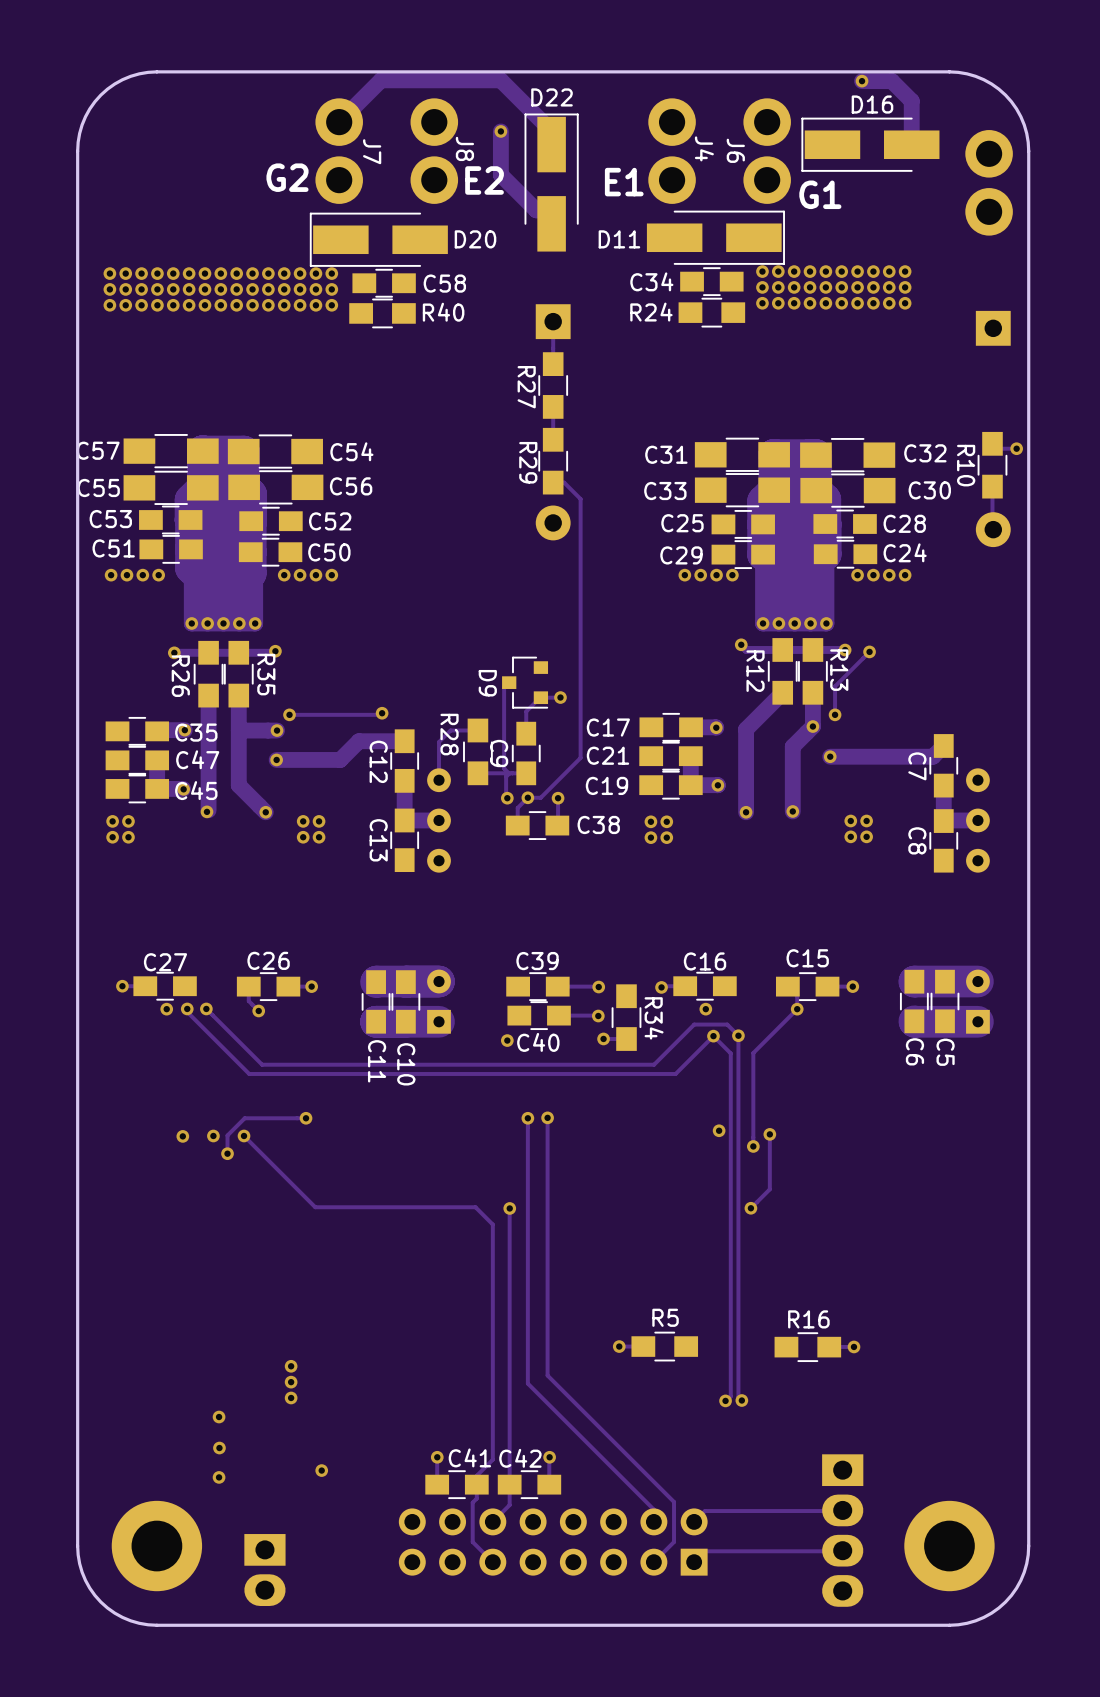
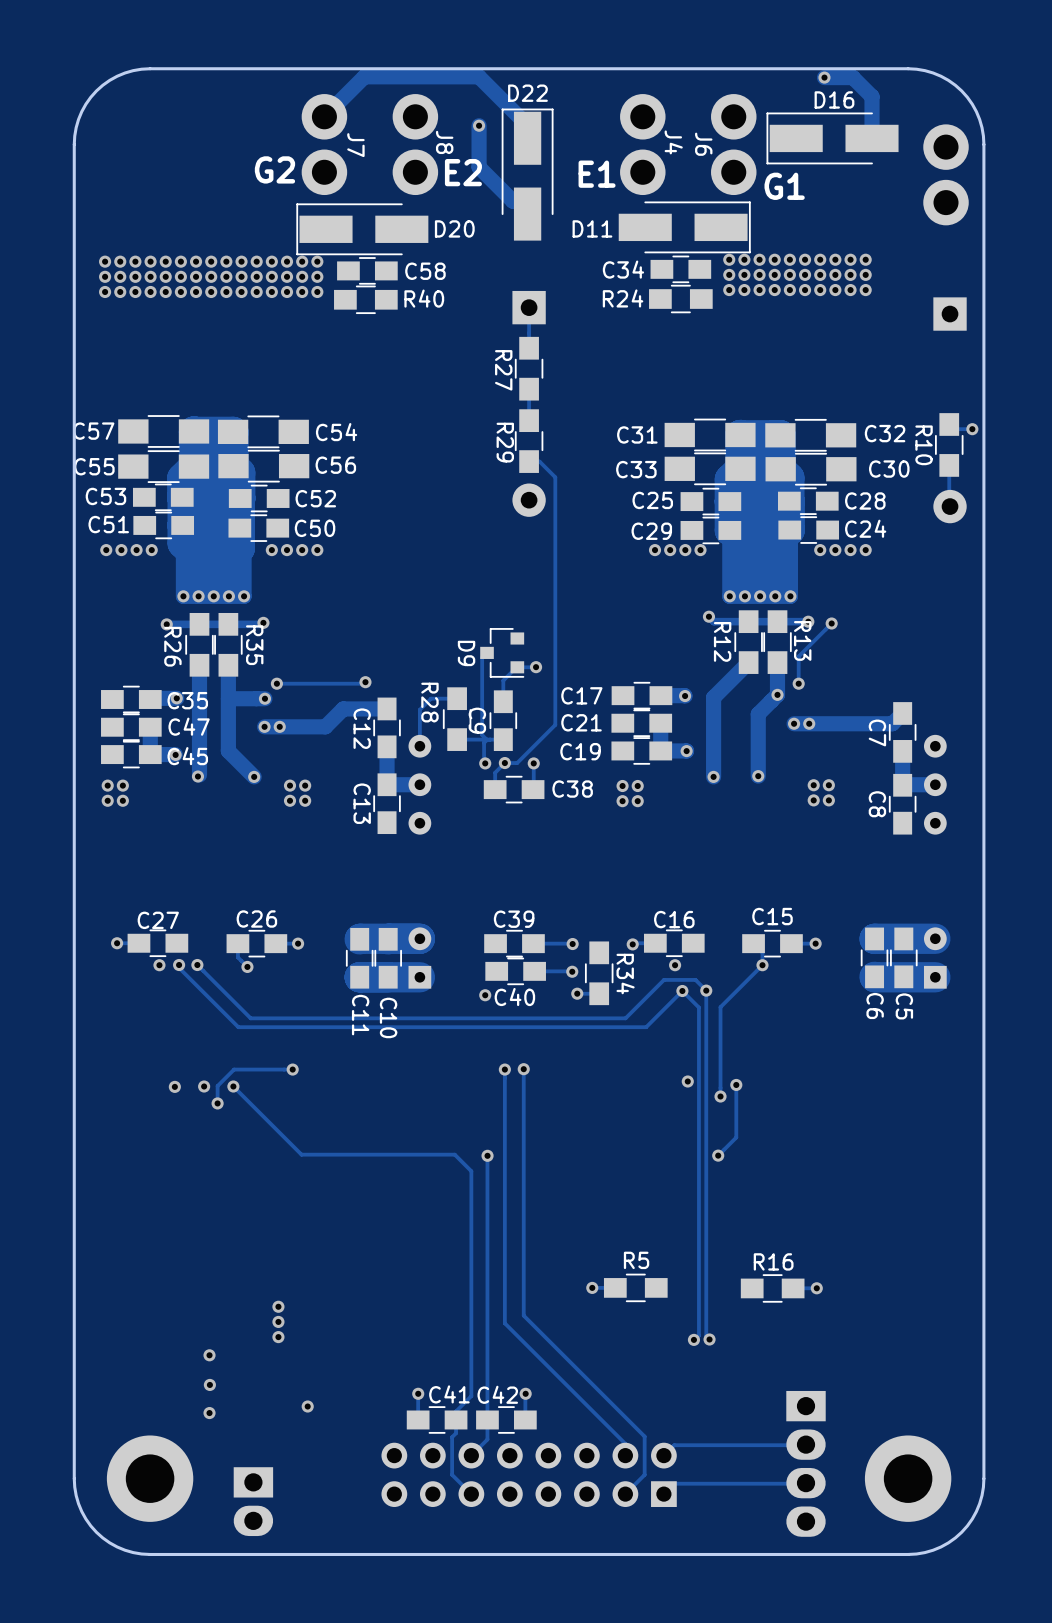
via: none -> (809, 723)
via: none -> (279, 726)

